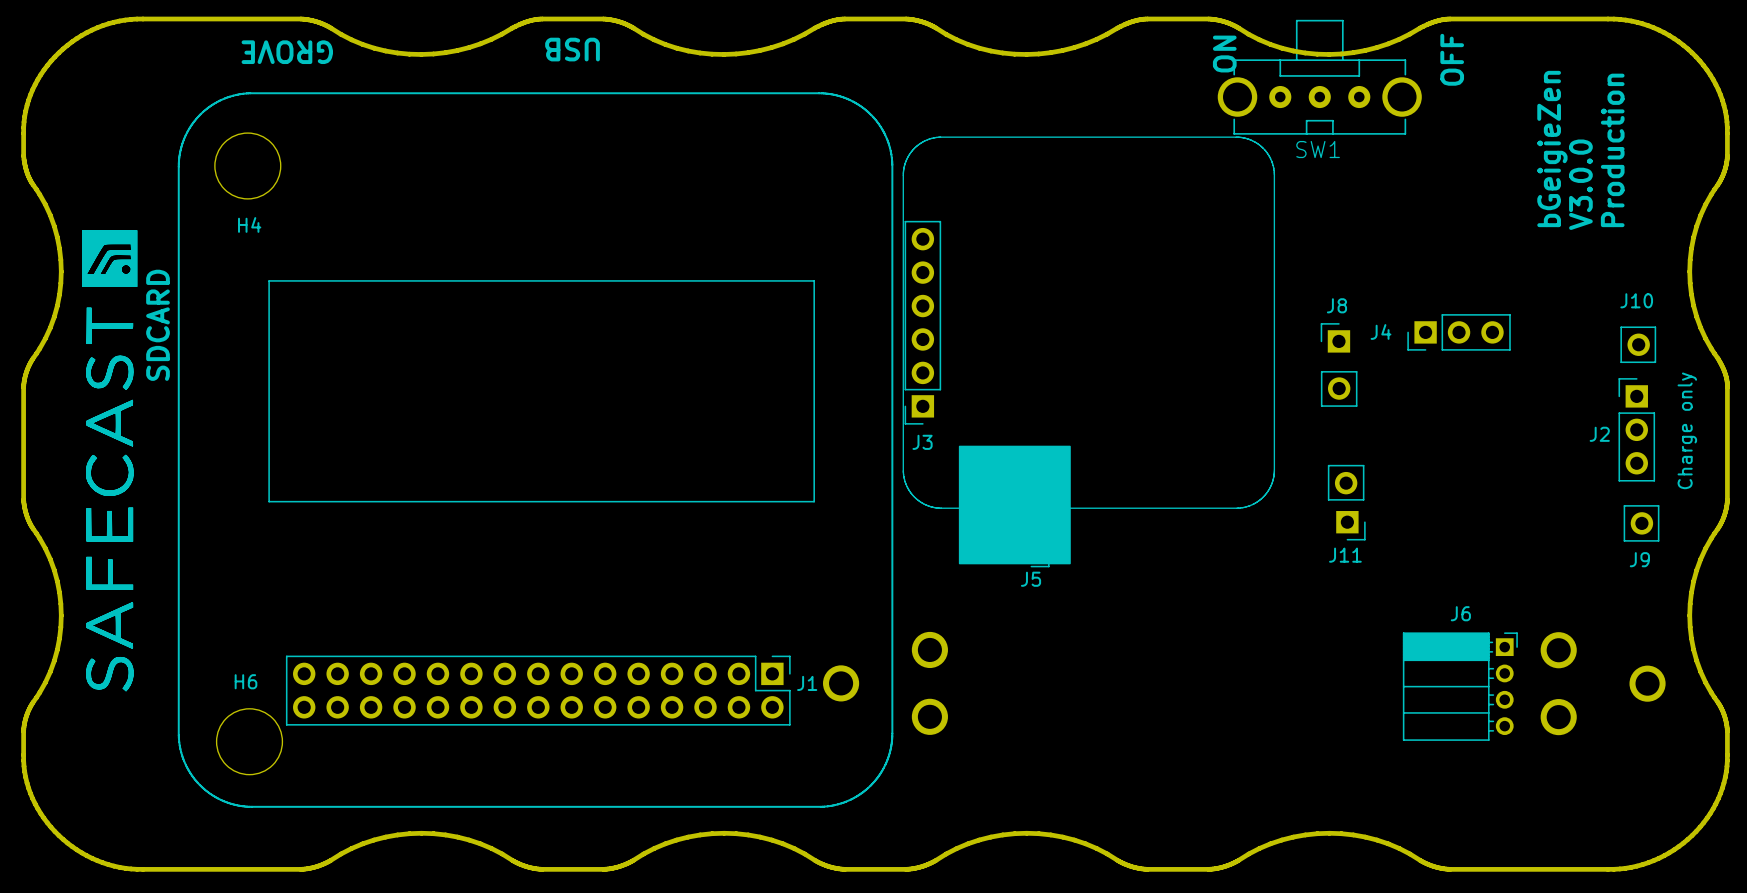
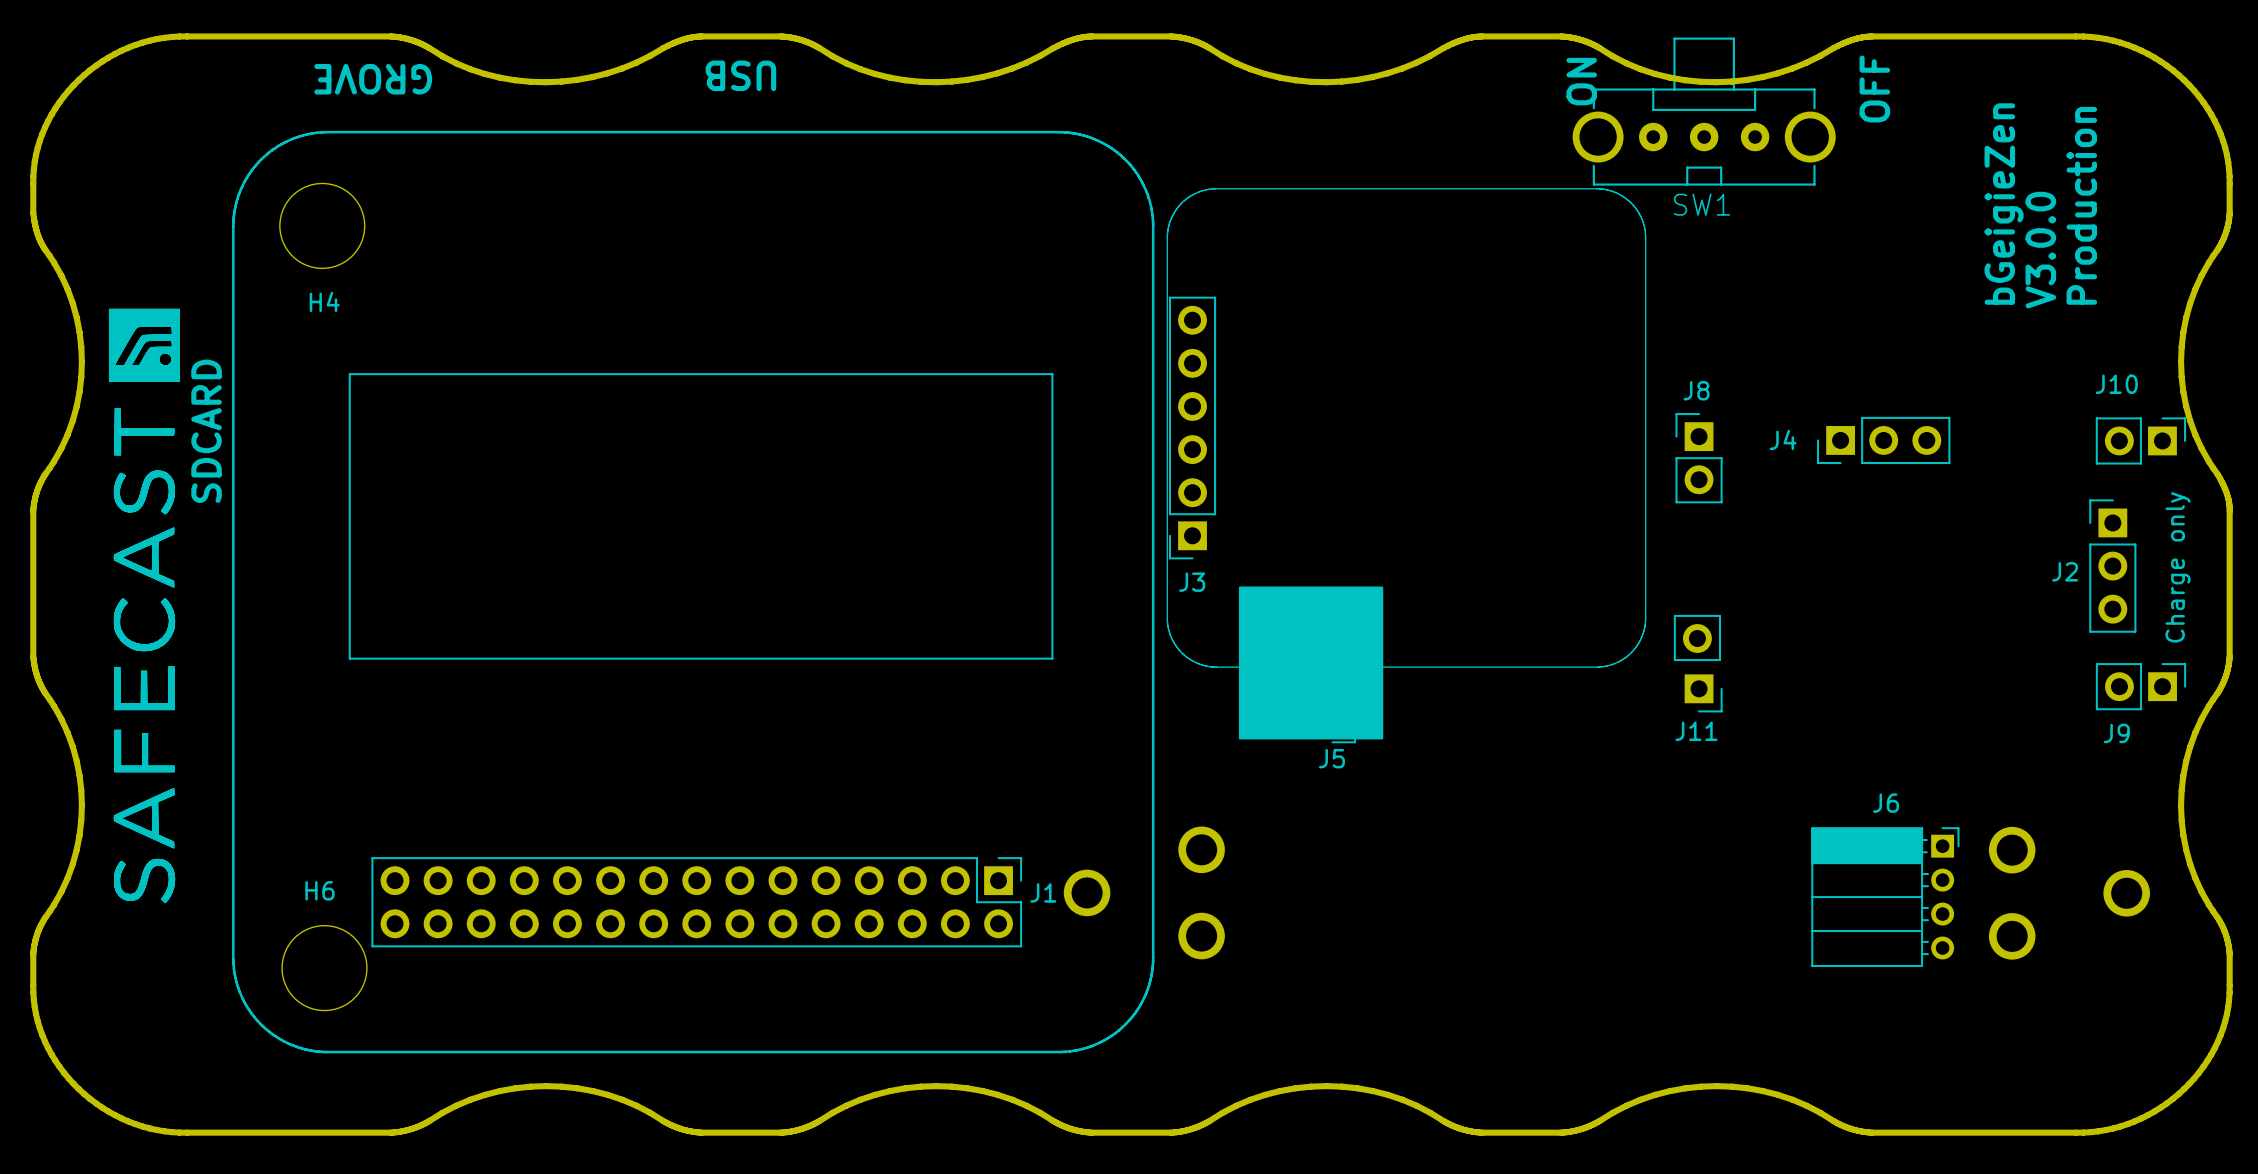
J8 footprint: [1320, 323, 1358, 407] -> [1675, 413, 1723, 504]
J10 footprint: [1620, 326, 1657, 364] -> [2095, 417, 2187, 465]
J11 position: (1346, 502) -> (1698, 663)
J9 footprint: [1623, 505, 1660, 542] -> [2095, 663, 2187, 711]

